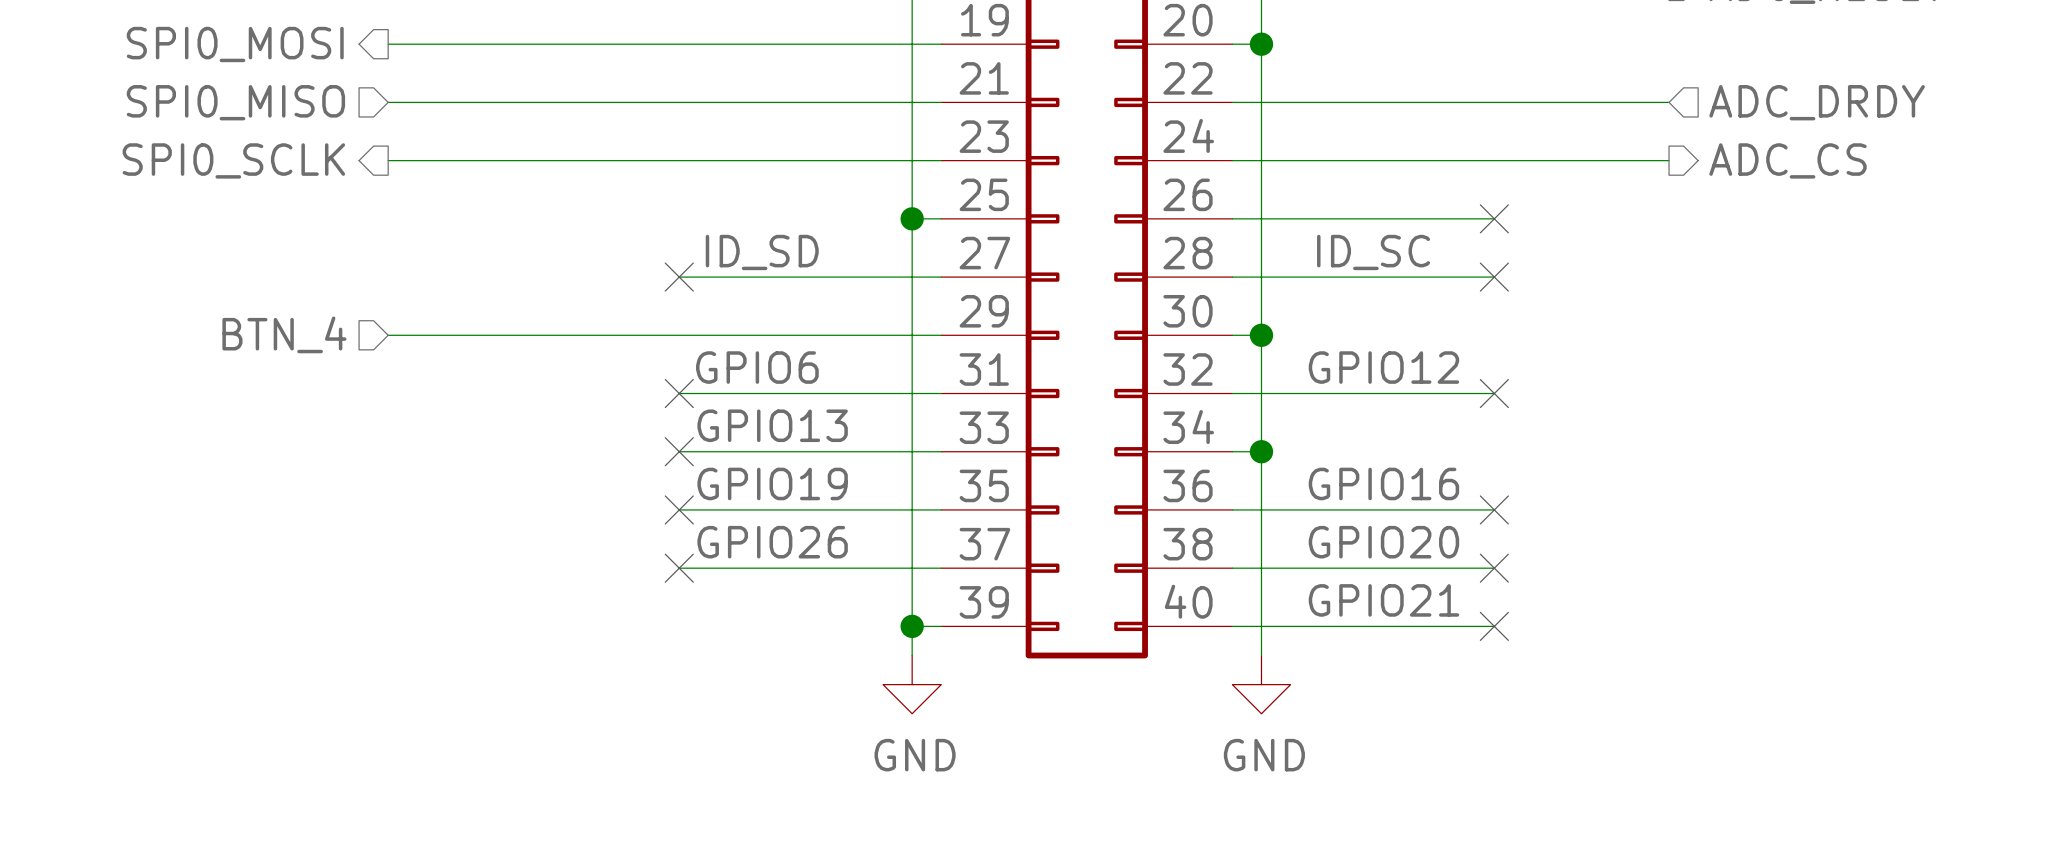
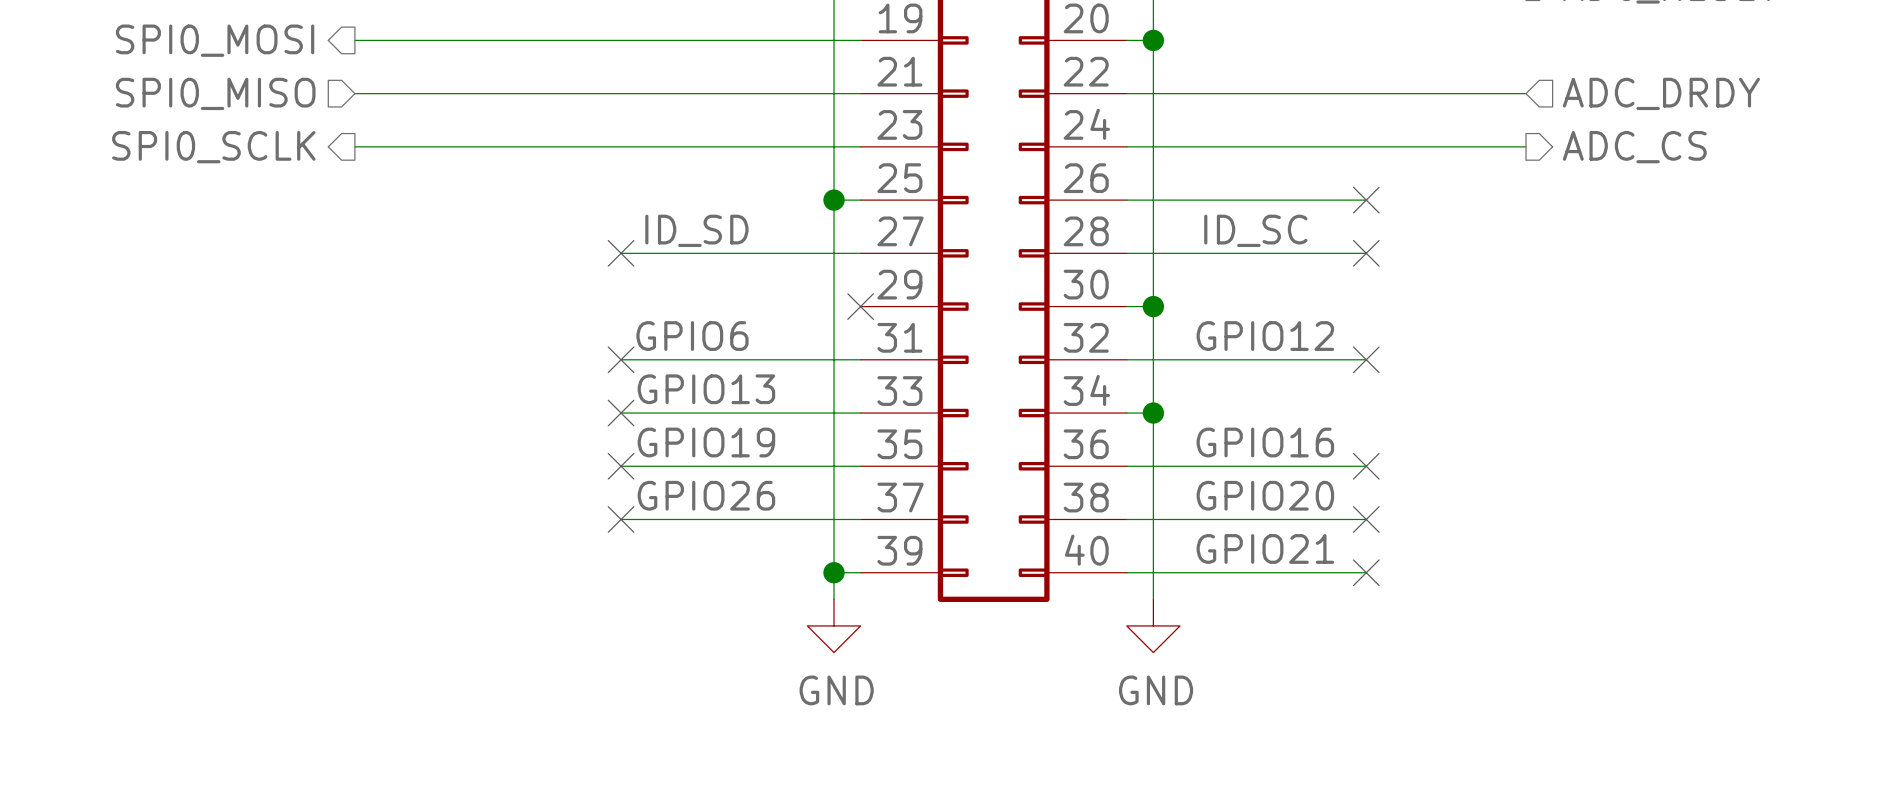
hierarchical label: BTN_4 (284, 334) -> none
wire: (388, 335) (941, 335) -> none
no-connect mark: none -> (860, 306)

